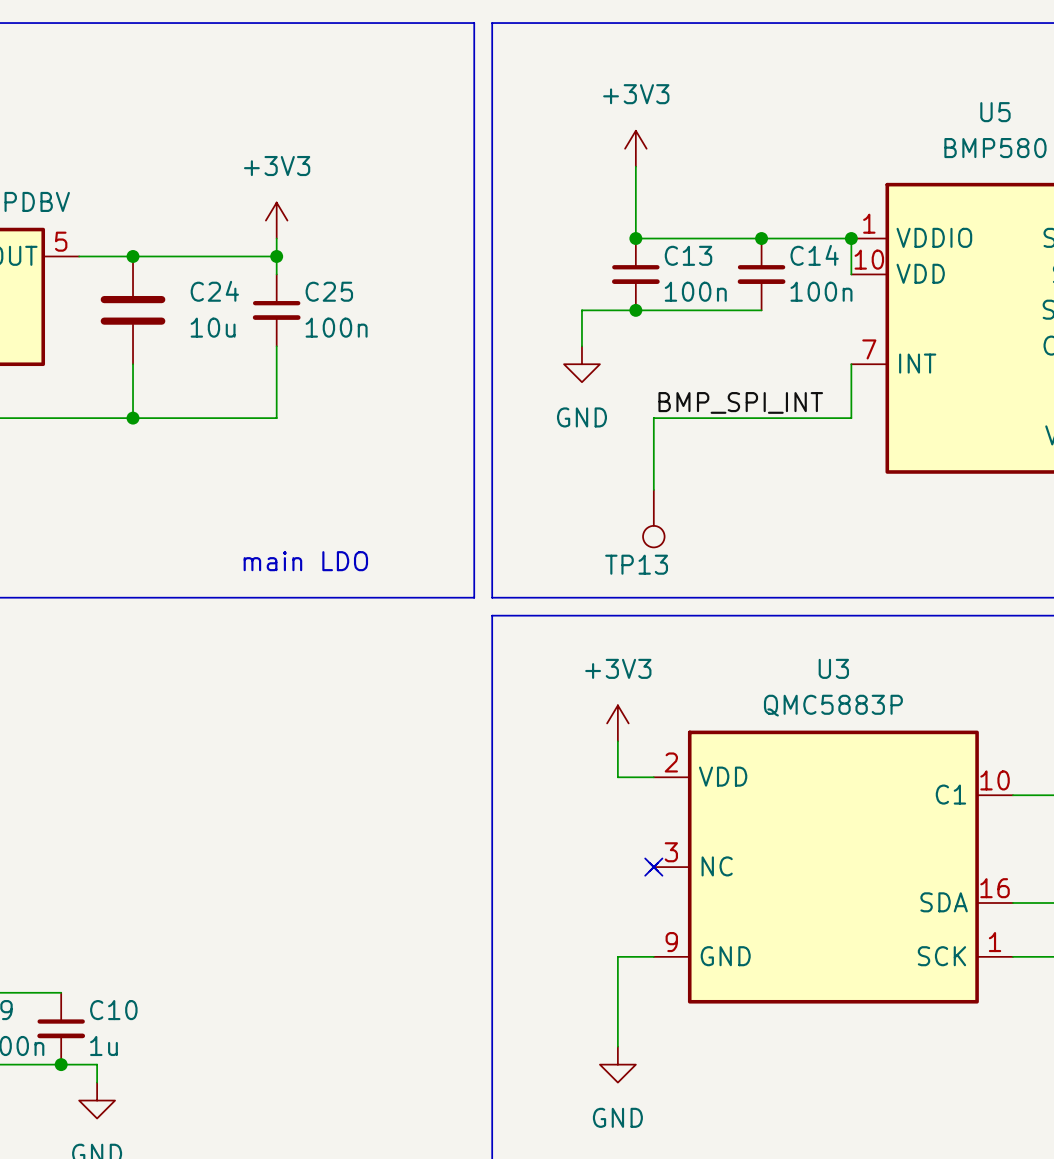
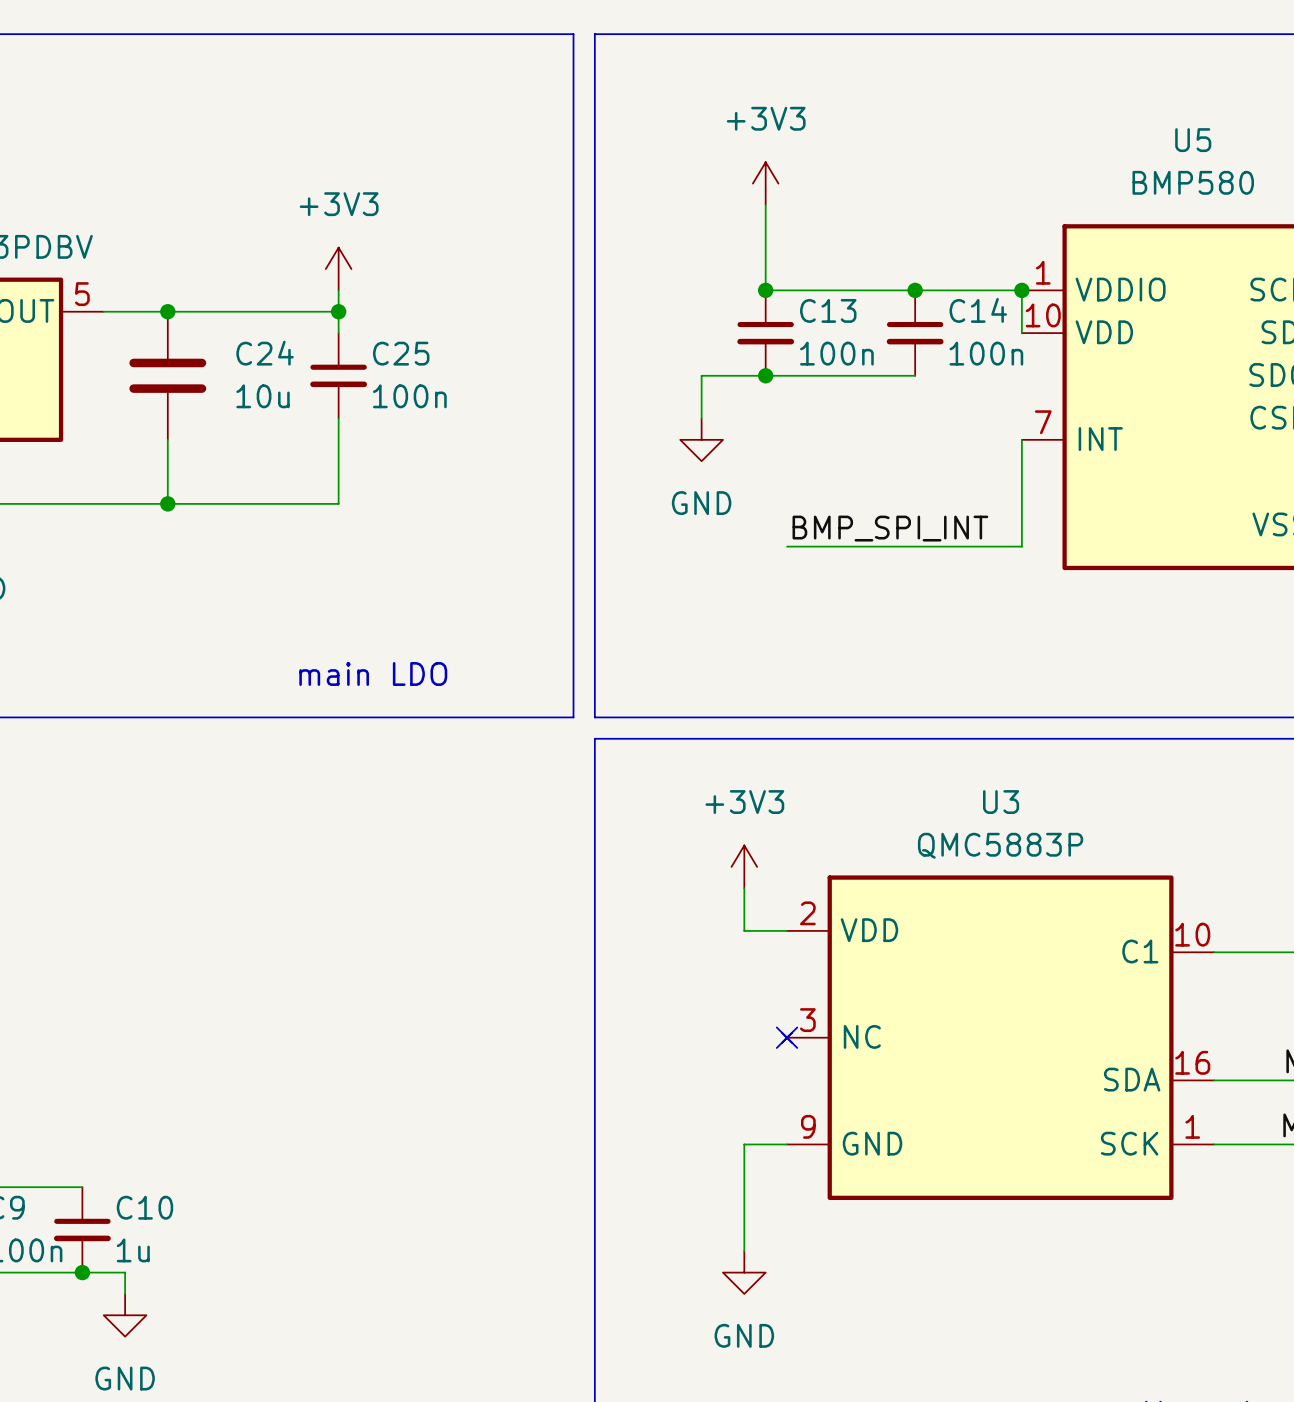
label position: BMP_SPI_INT (740, 402) -> BMP_SPI_INT (890, 528)
wire: (851, 418) (653, 418) (653, 489) -> (1021, 503) (1021, 546) (787, 546)
TP13: (653, 518) -> none

